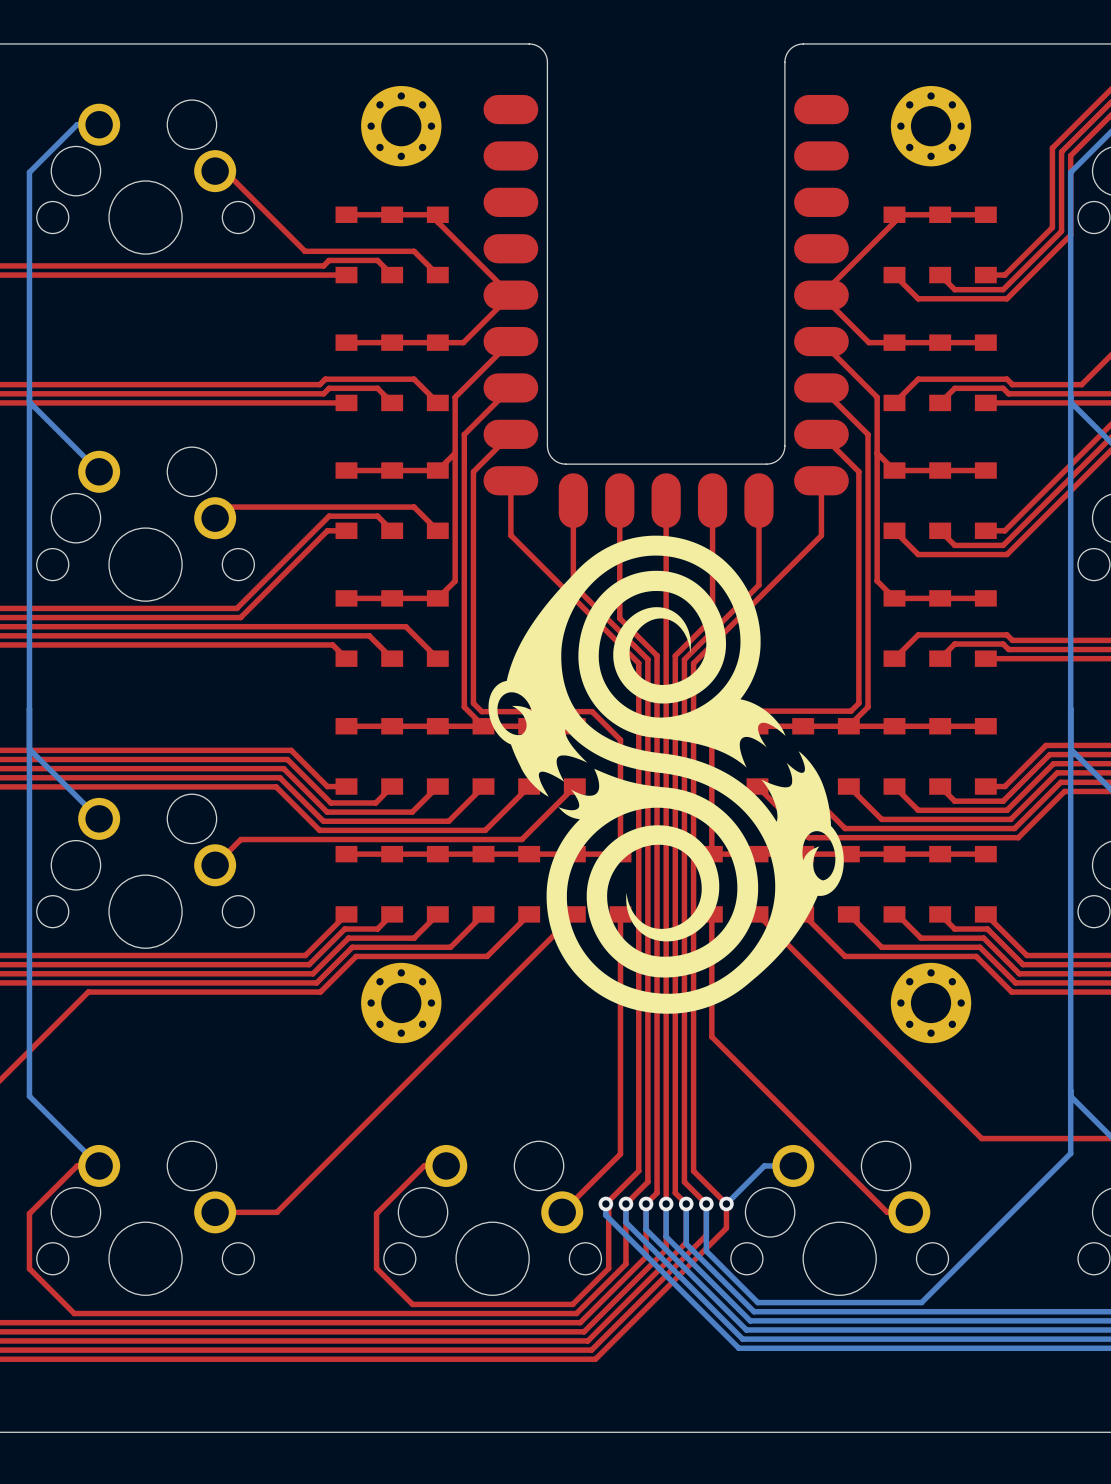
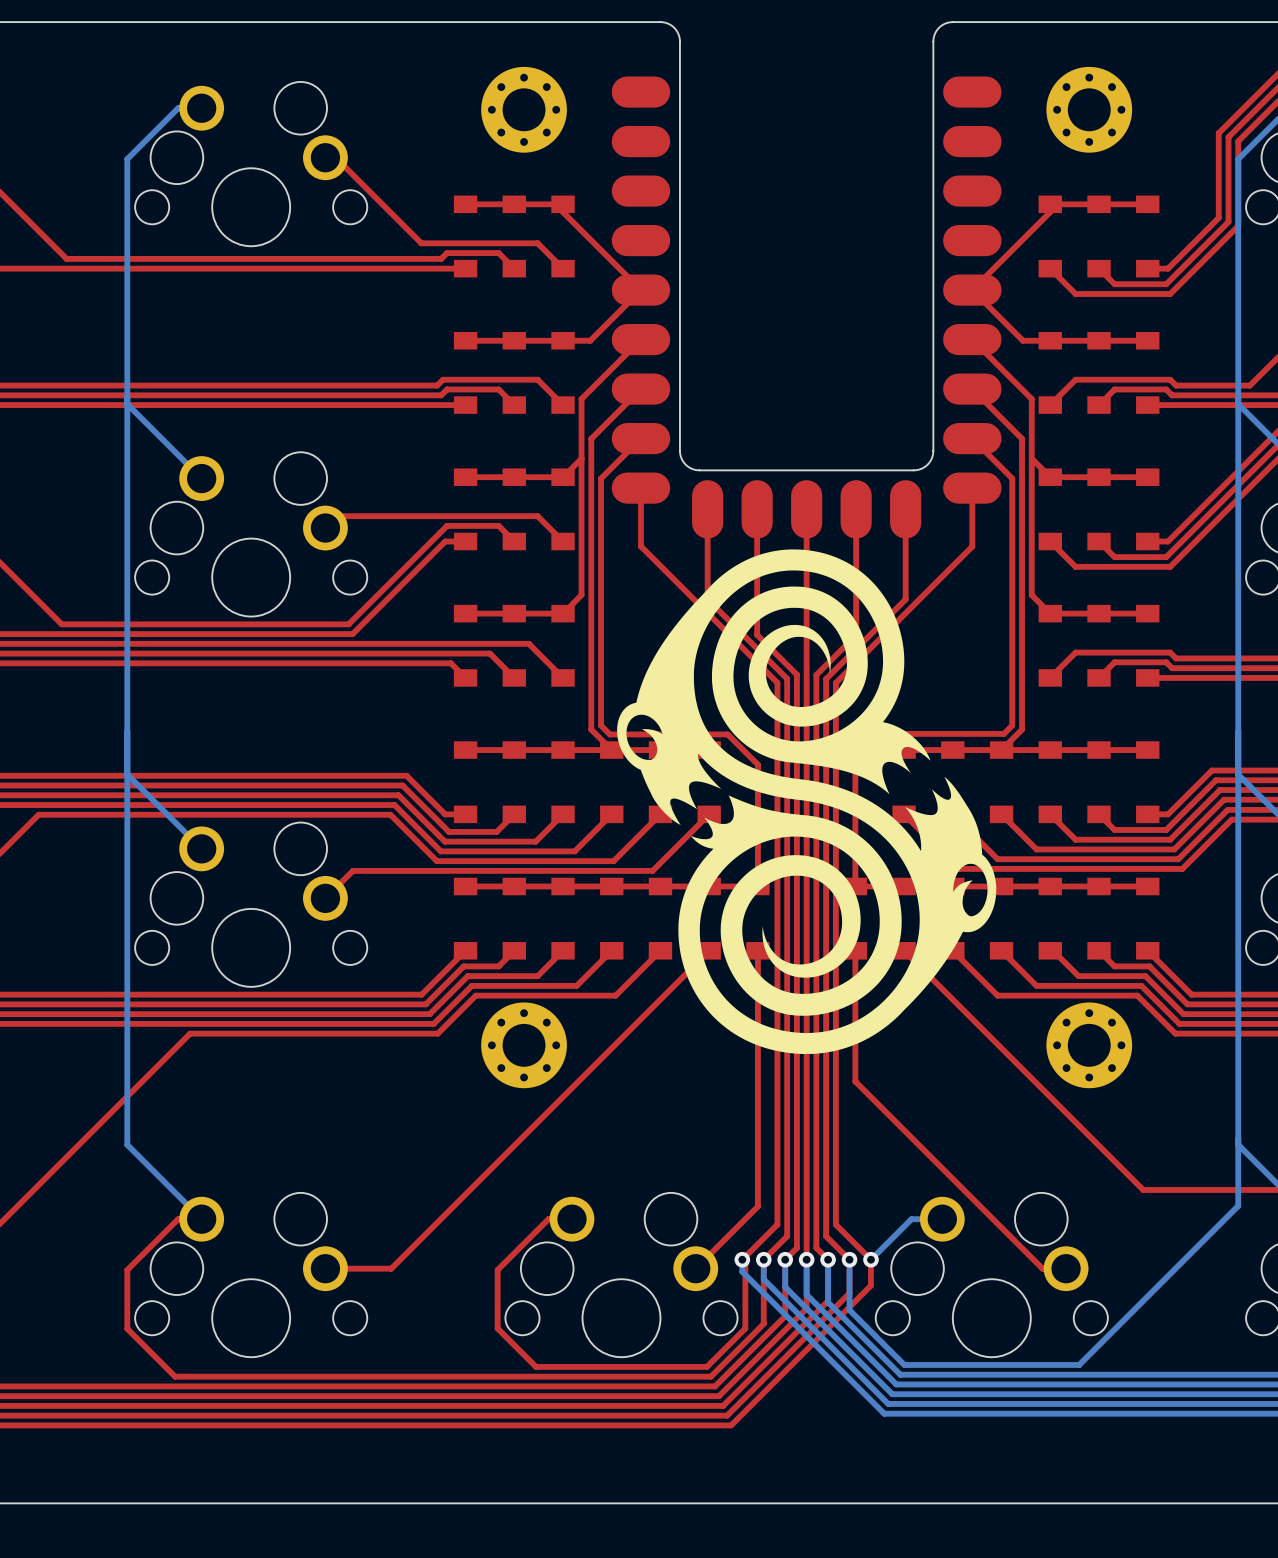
drawing shape: [488, 535, 844, 1014] -> [617, 549, 997, 1055]

